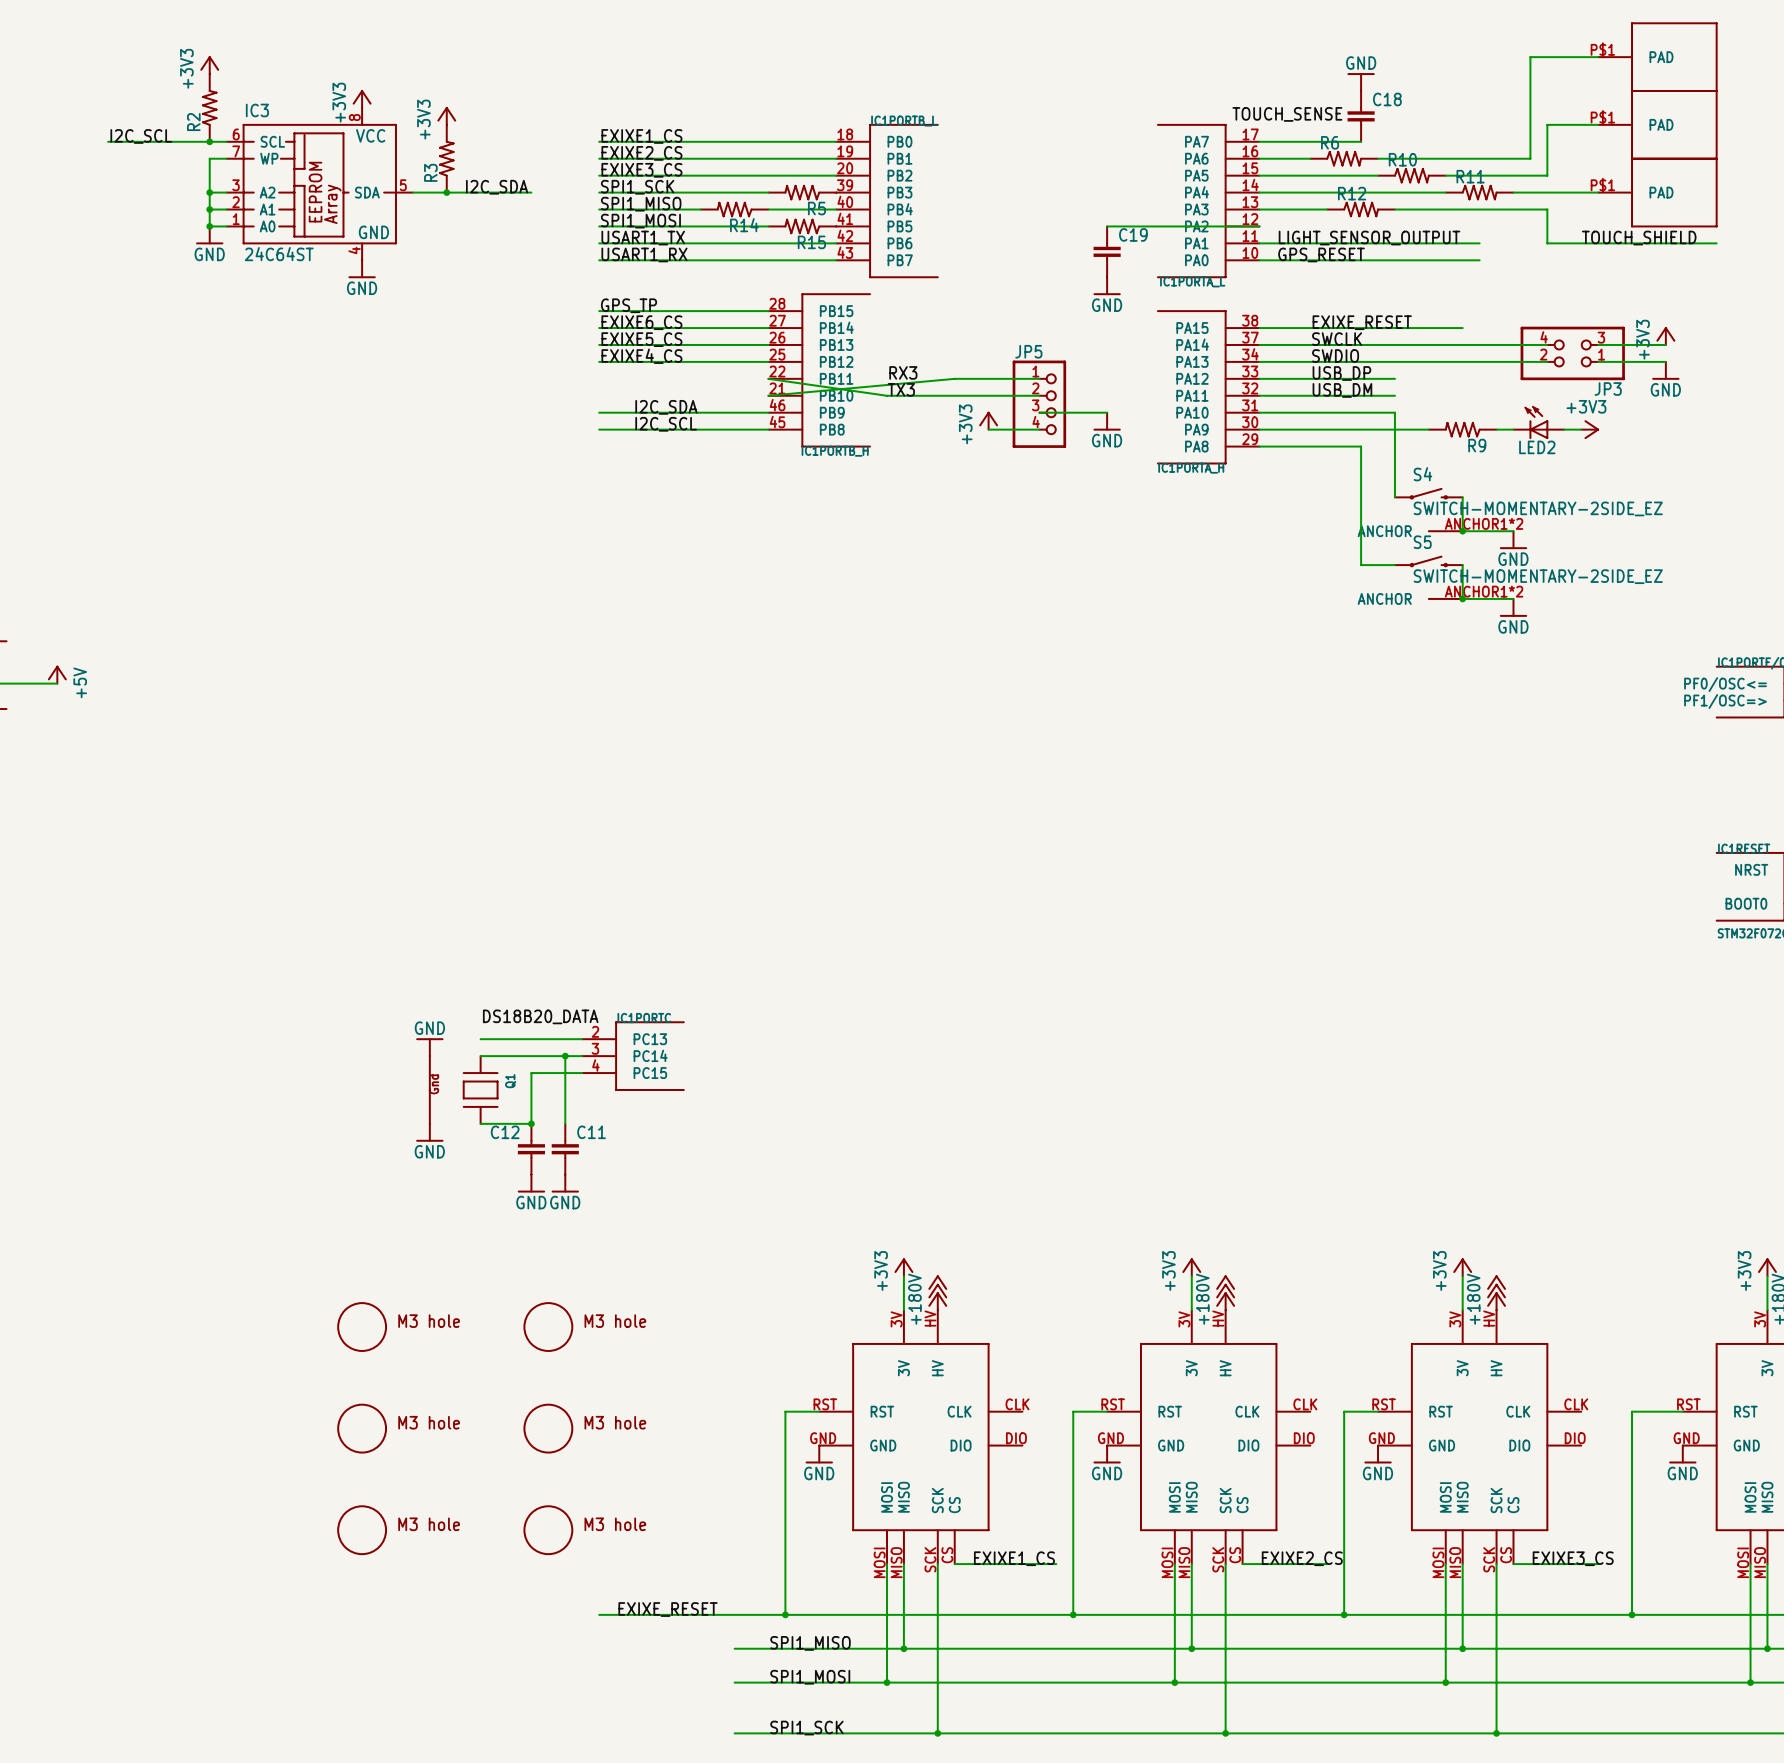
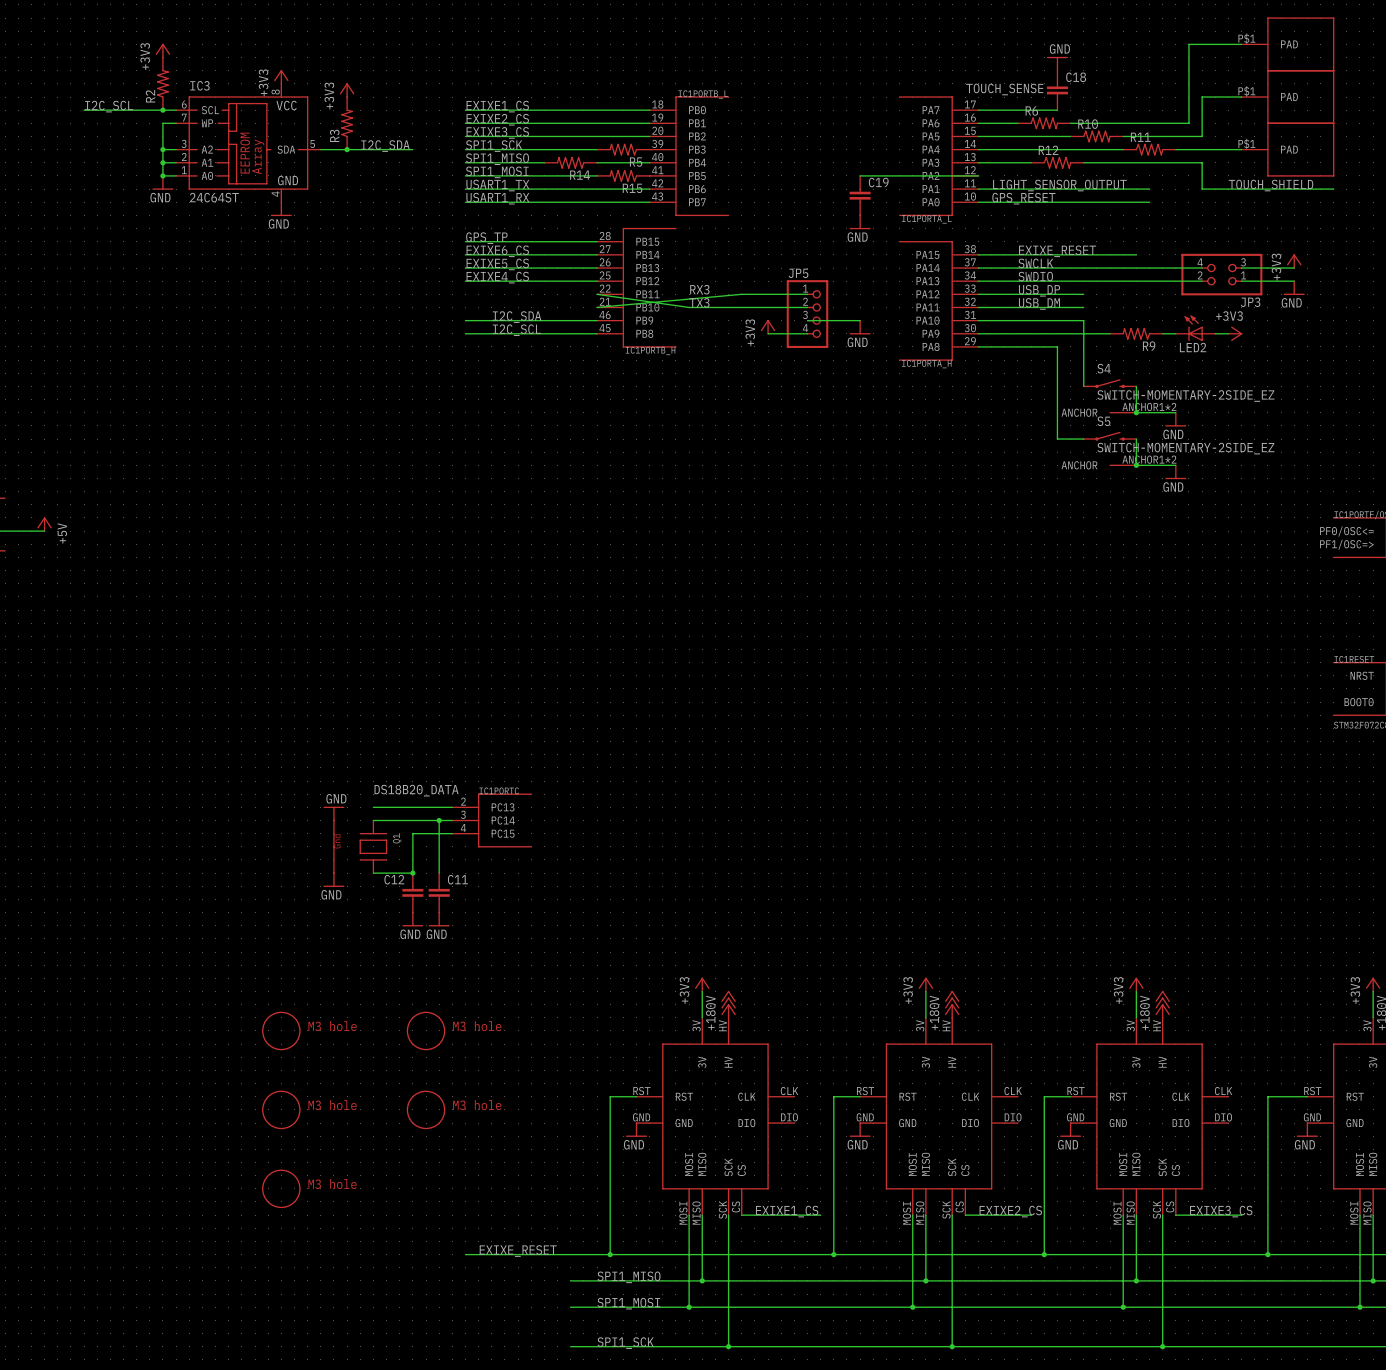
part: (548, 1530) -> none

